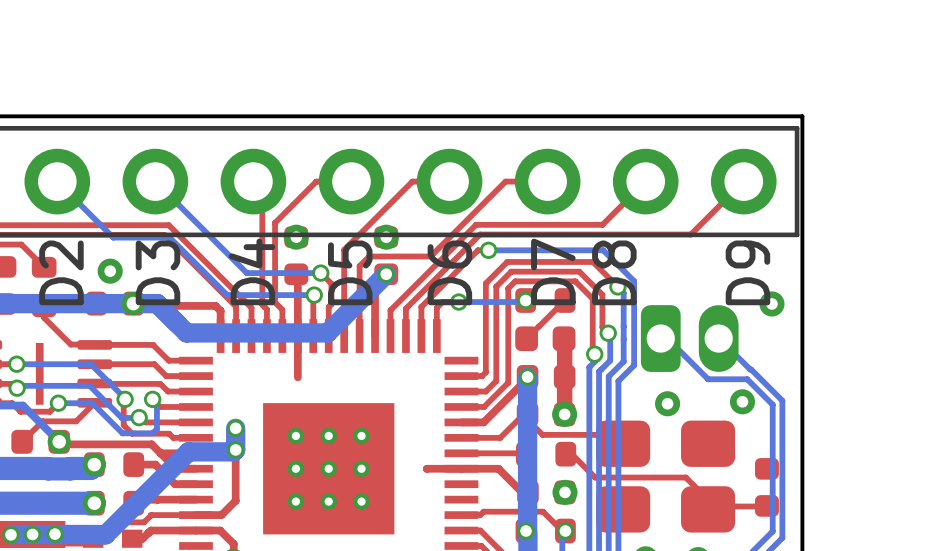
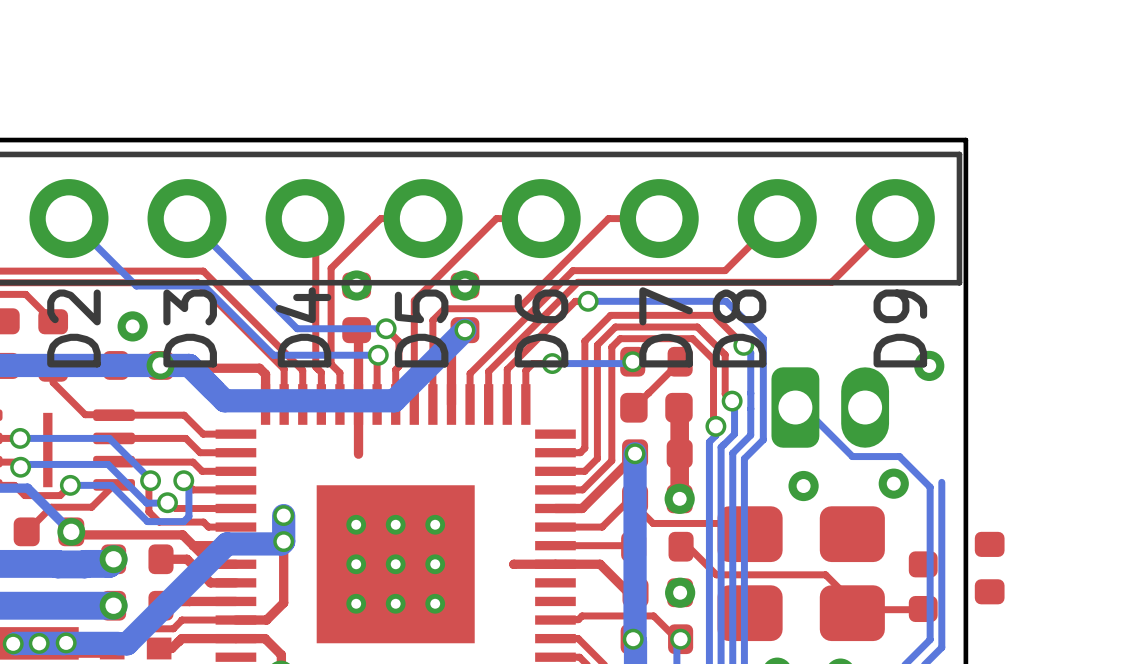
bottom track: (719, 338) (782, 400) -> none
part: none -> (989, 568)

